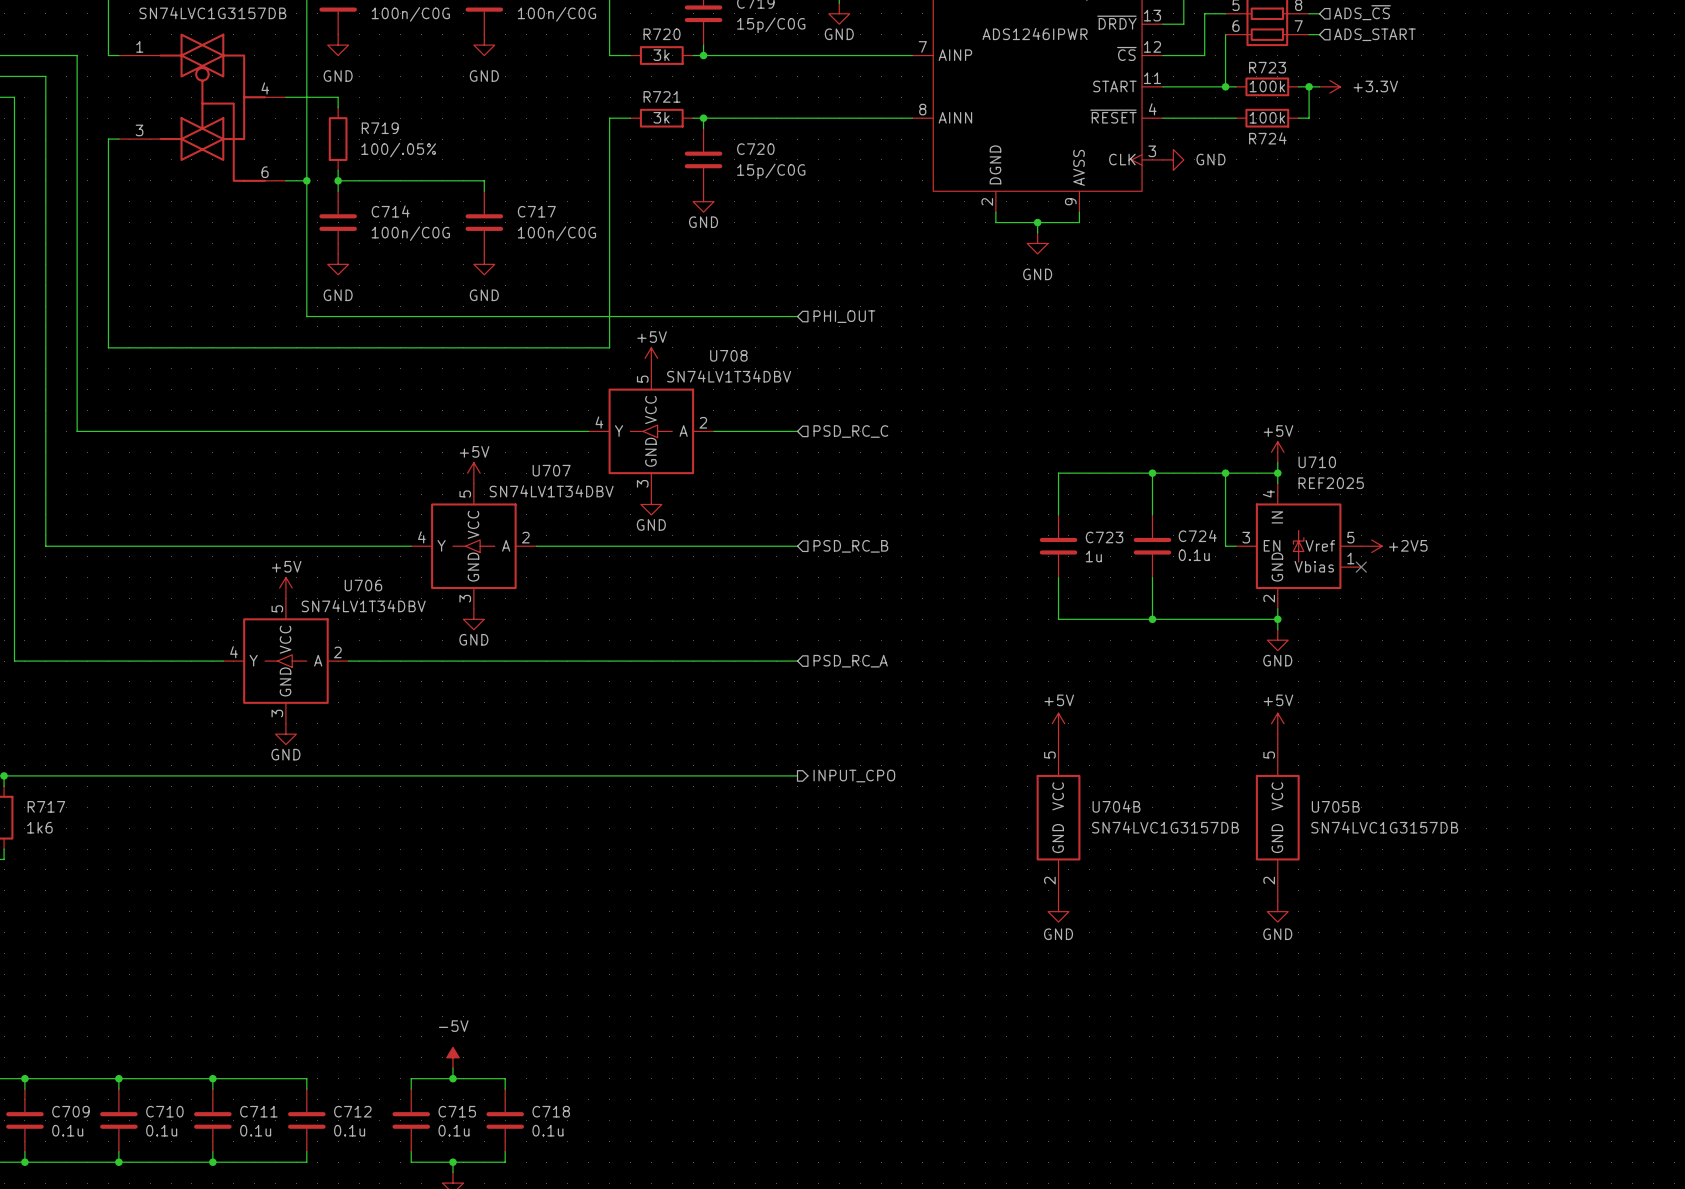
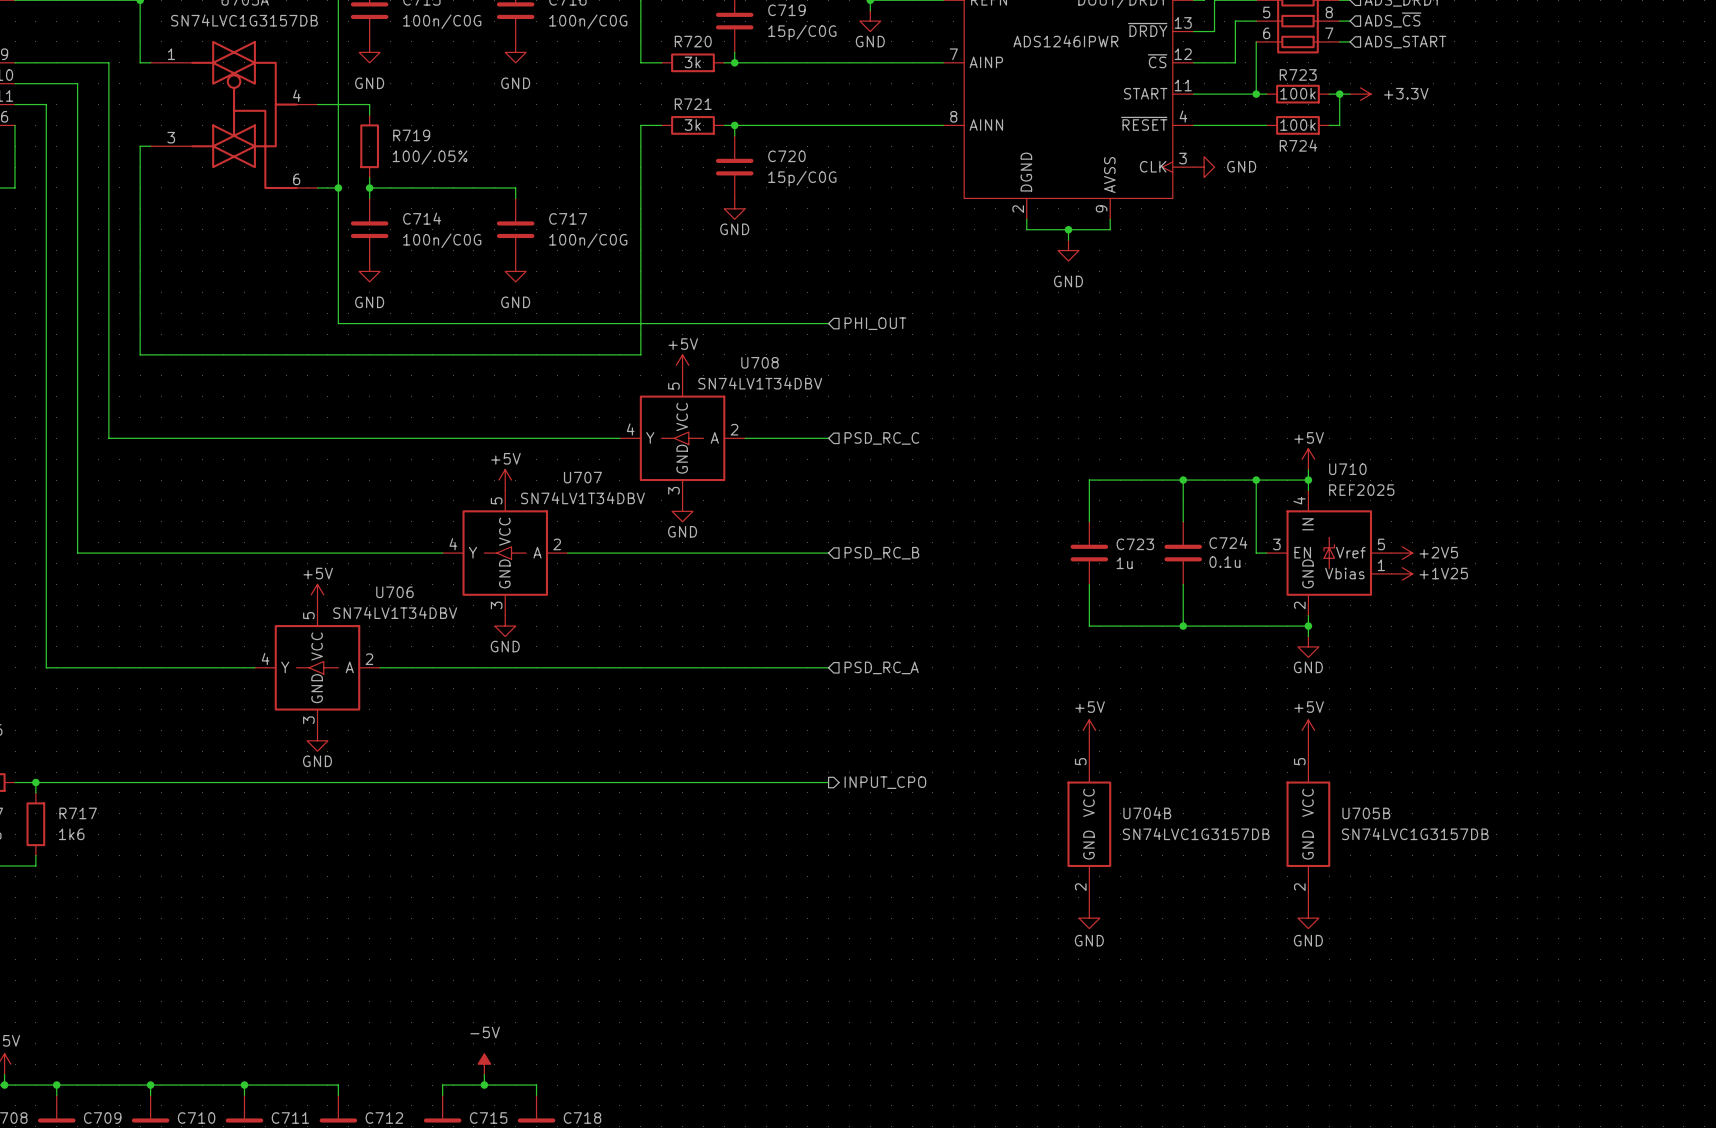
no-connect mark: (1361, 567) -> none
power symbol: none -> +1V25 (1402, 573)

